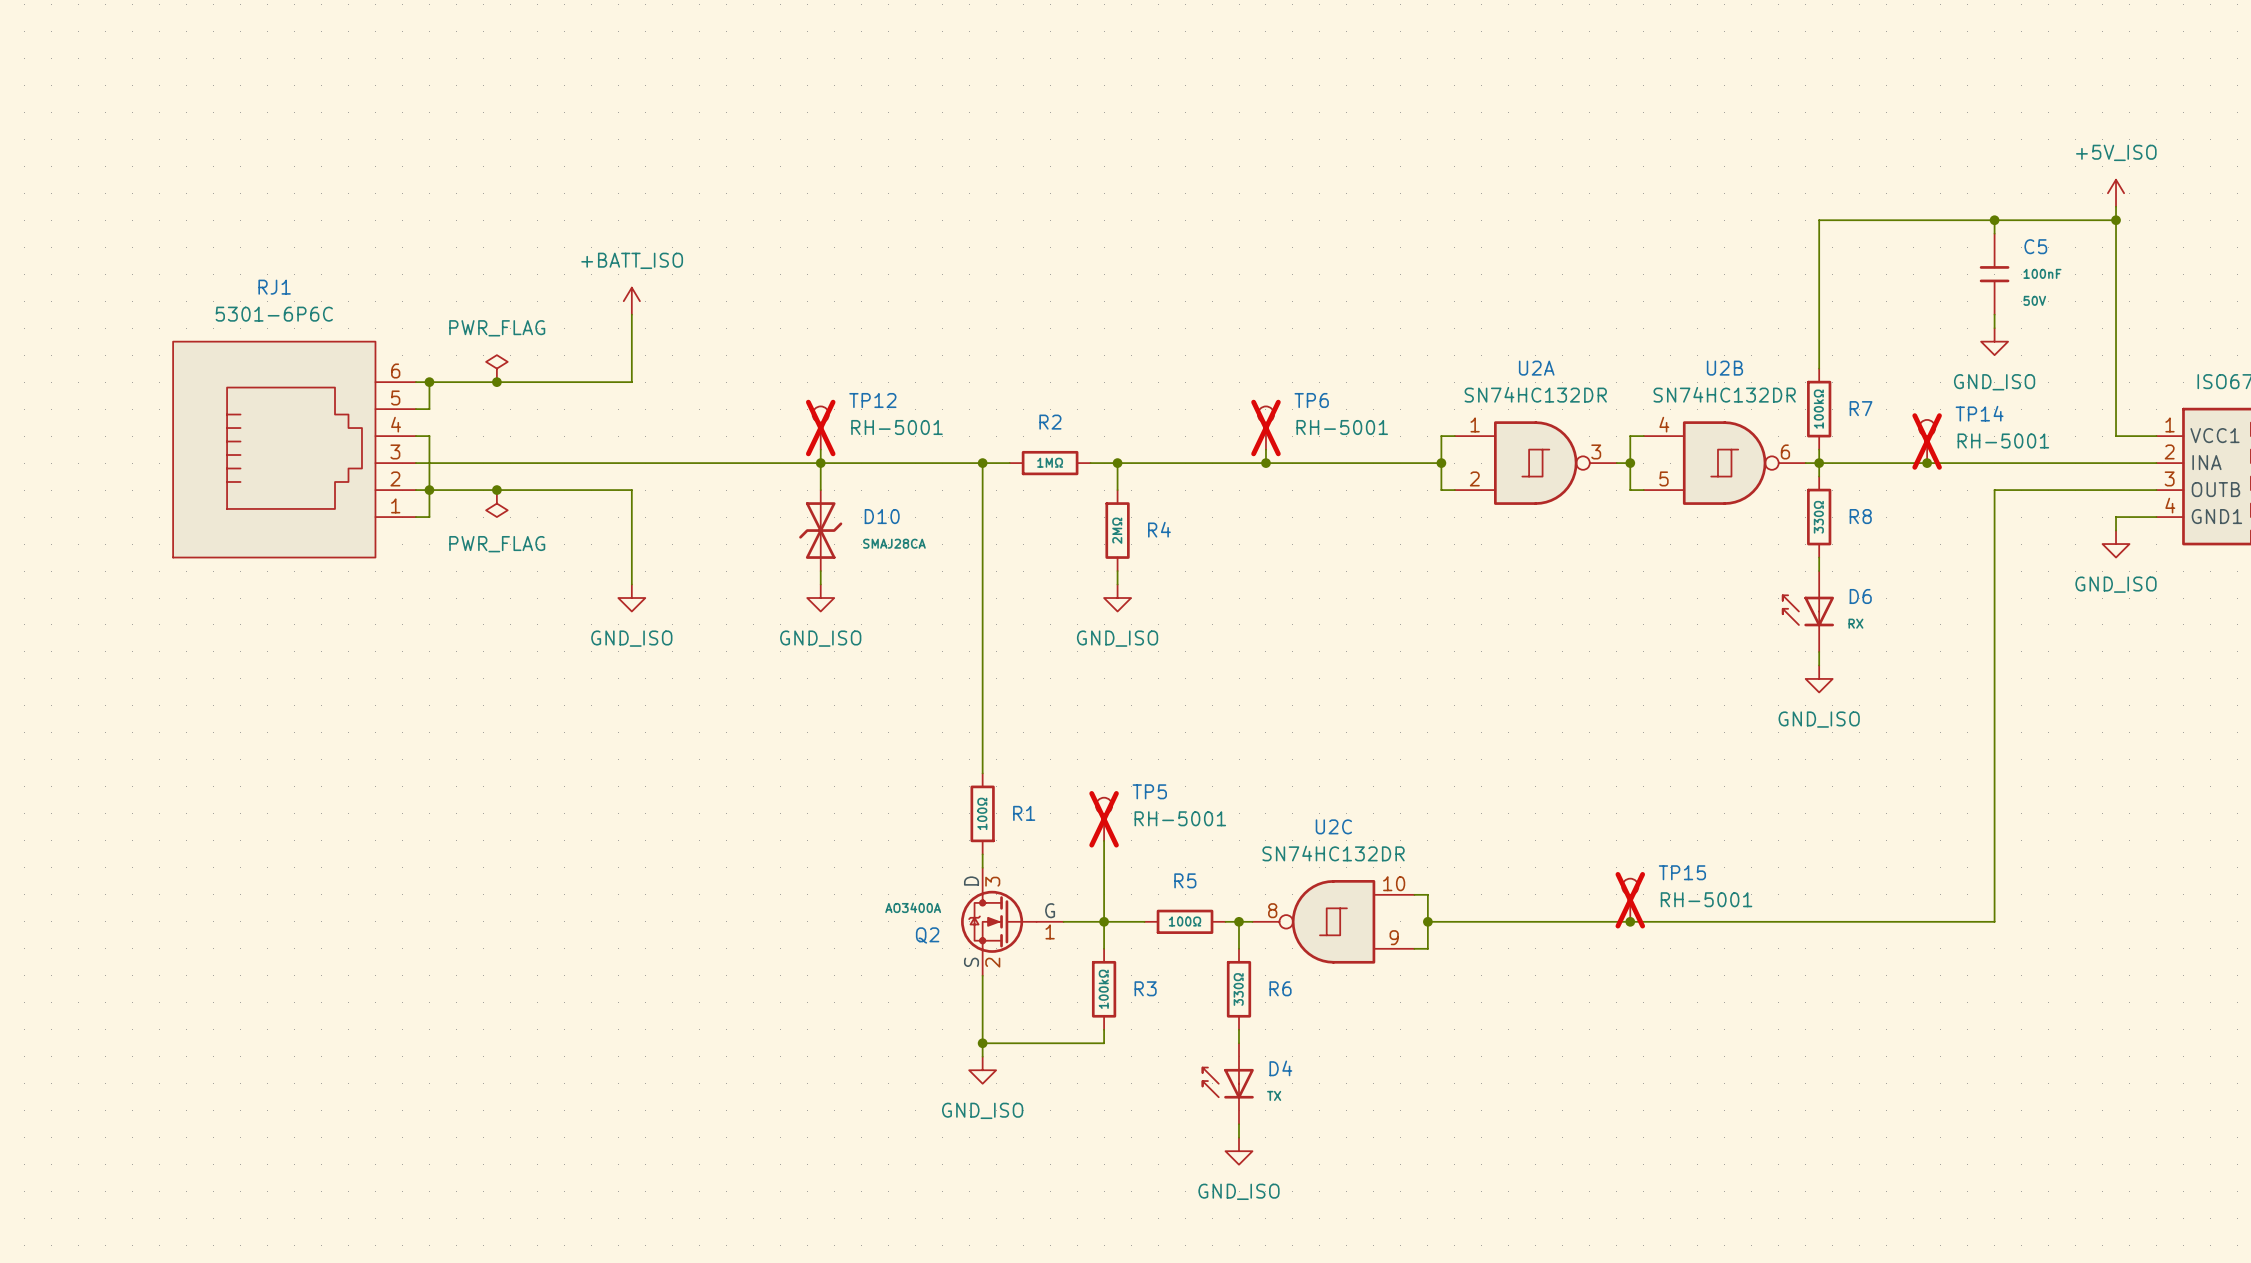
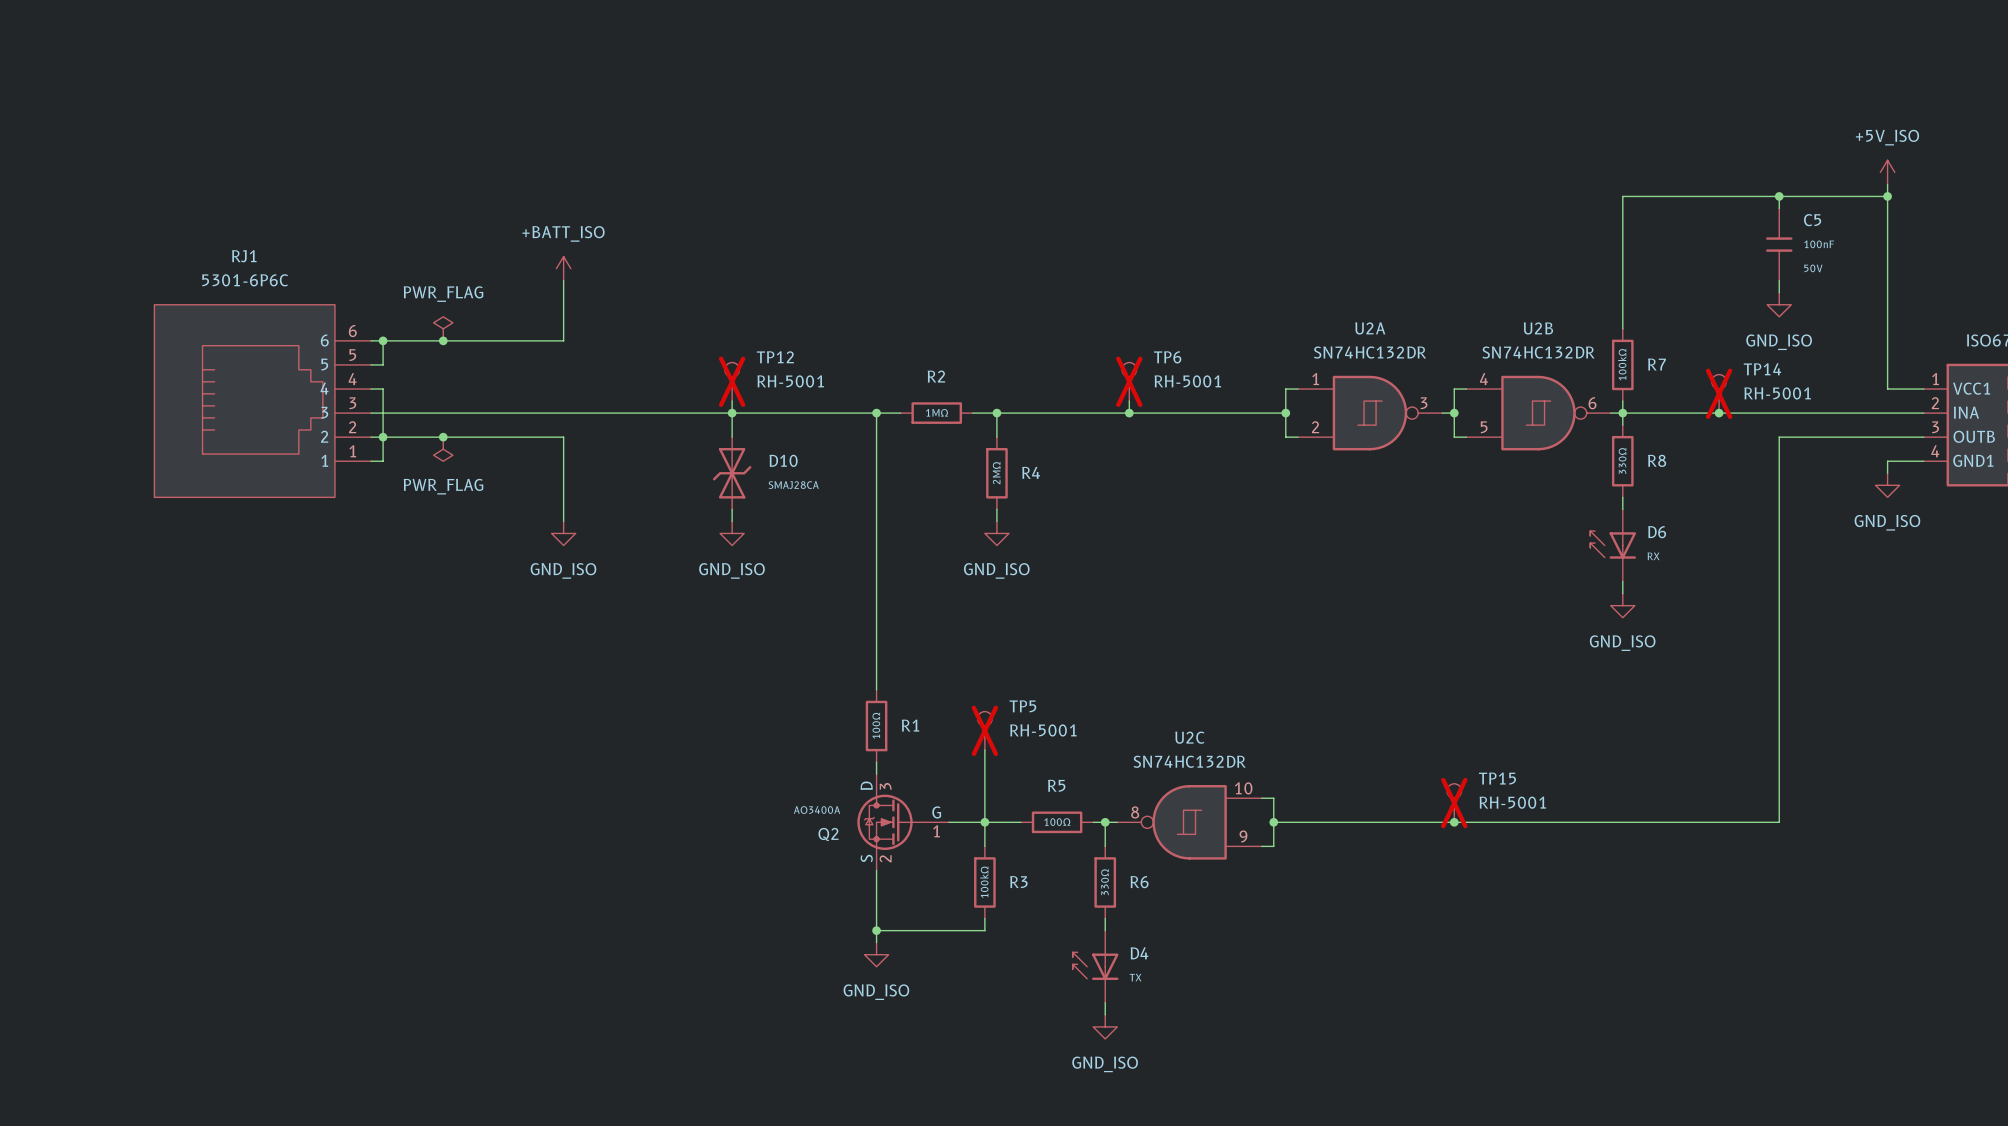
RJ1 pin name: none -> 6 (324, 340)
RJ1 pin name: none -> 5 (324, 364)
RJ1 pin name: none -> 4 (324, 388)
RJ1 pin name: none -> 3 (324, 412)
RJ1 pin name: none -> 2 (324, 436)
RJ1 pin name: none -> 1 (324, 460)

